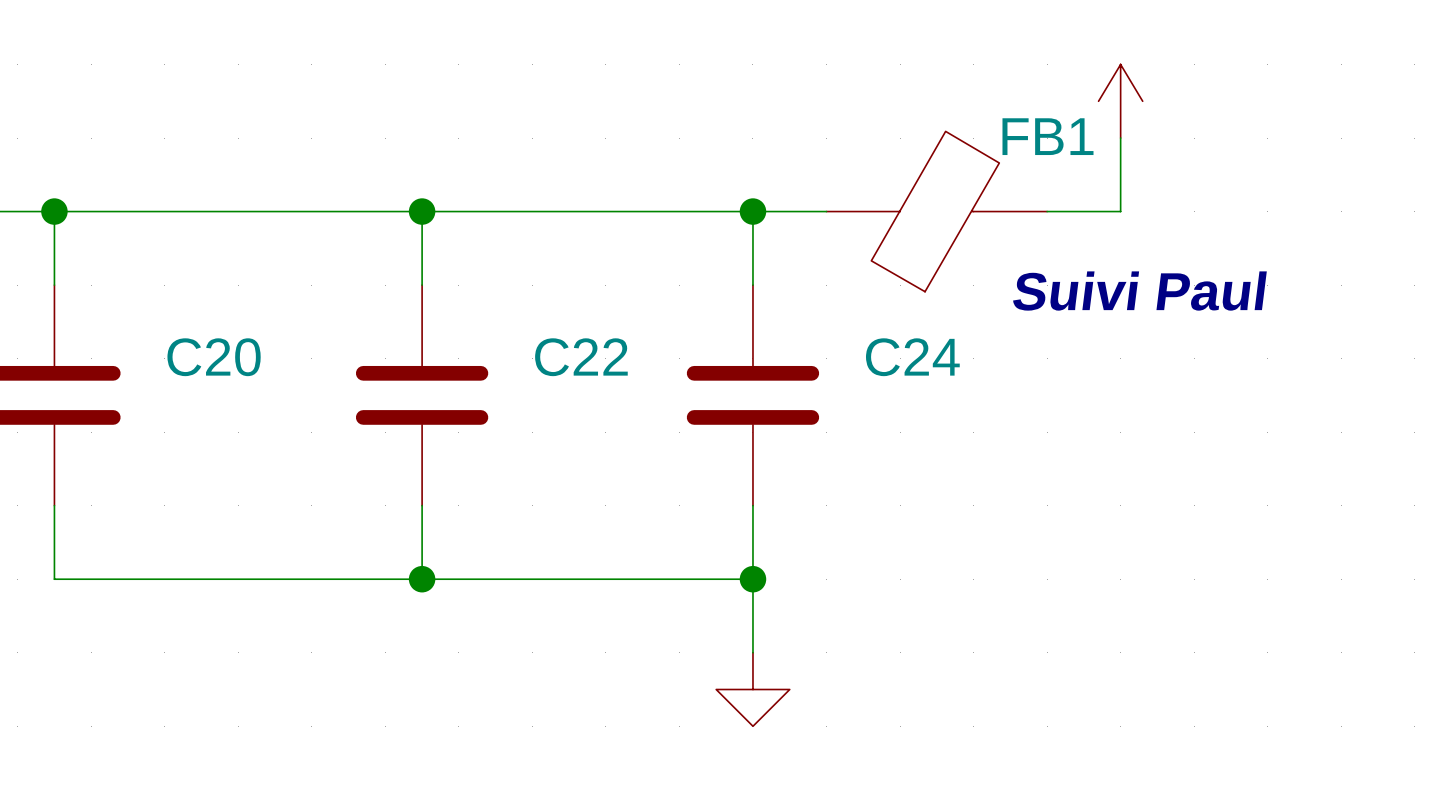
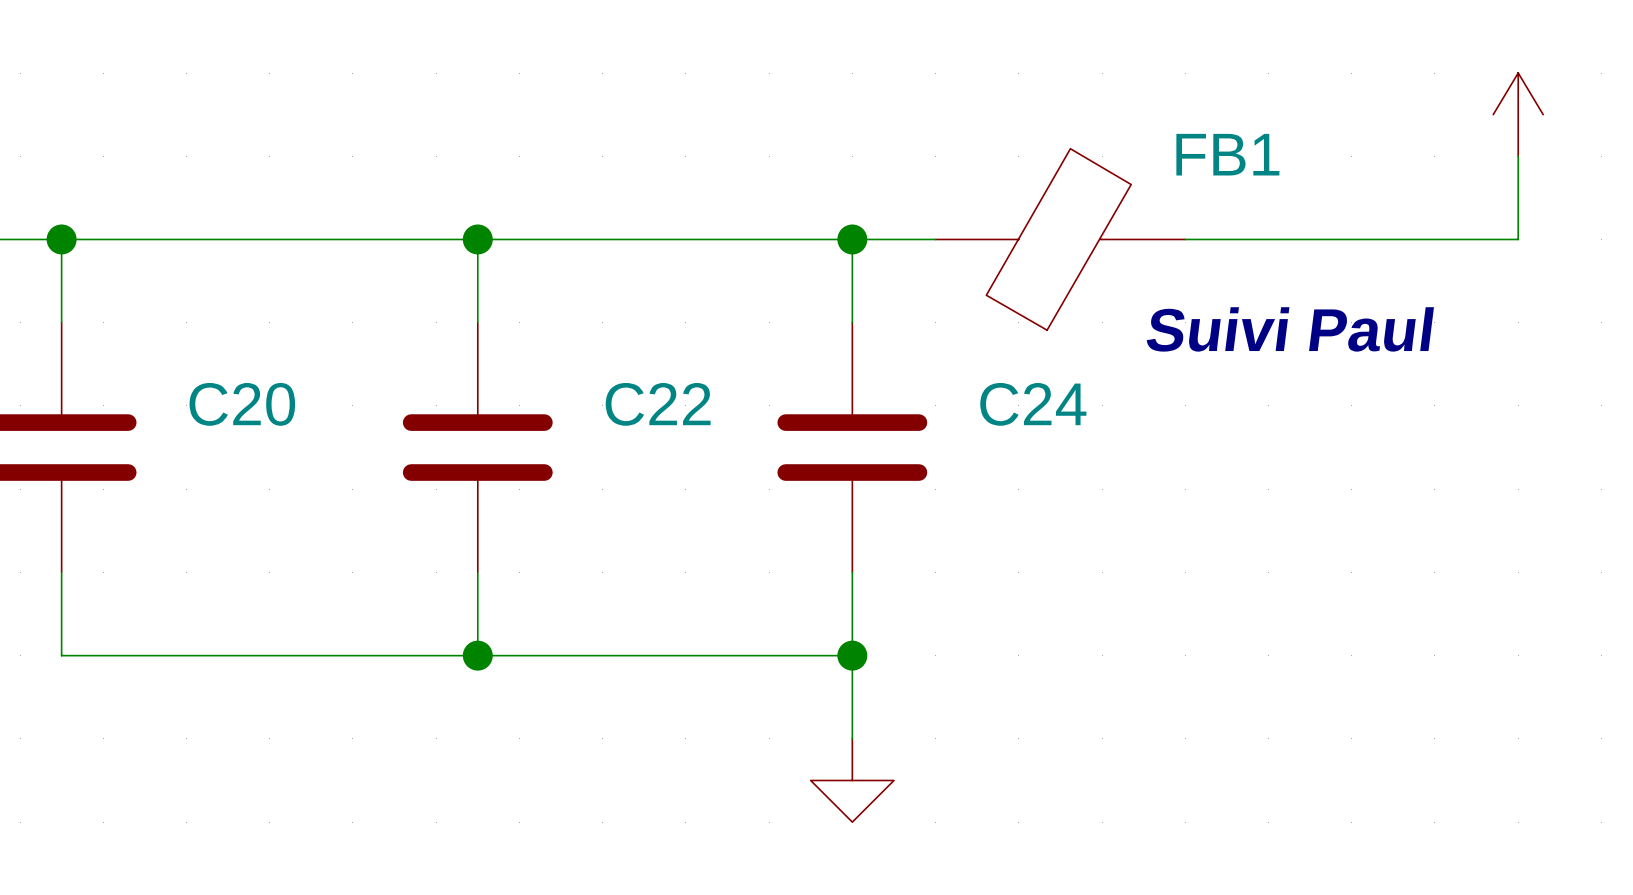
power symbol position: (1120, 101) -> (1518, 114)
FB1 name position: FB1 (1047, 136) -> FB1 (1227, 154)
wire: (1120, 138) (1120, 211) -> (1518, 156) (1518, 239) (1268, 239)

